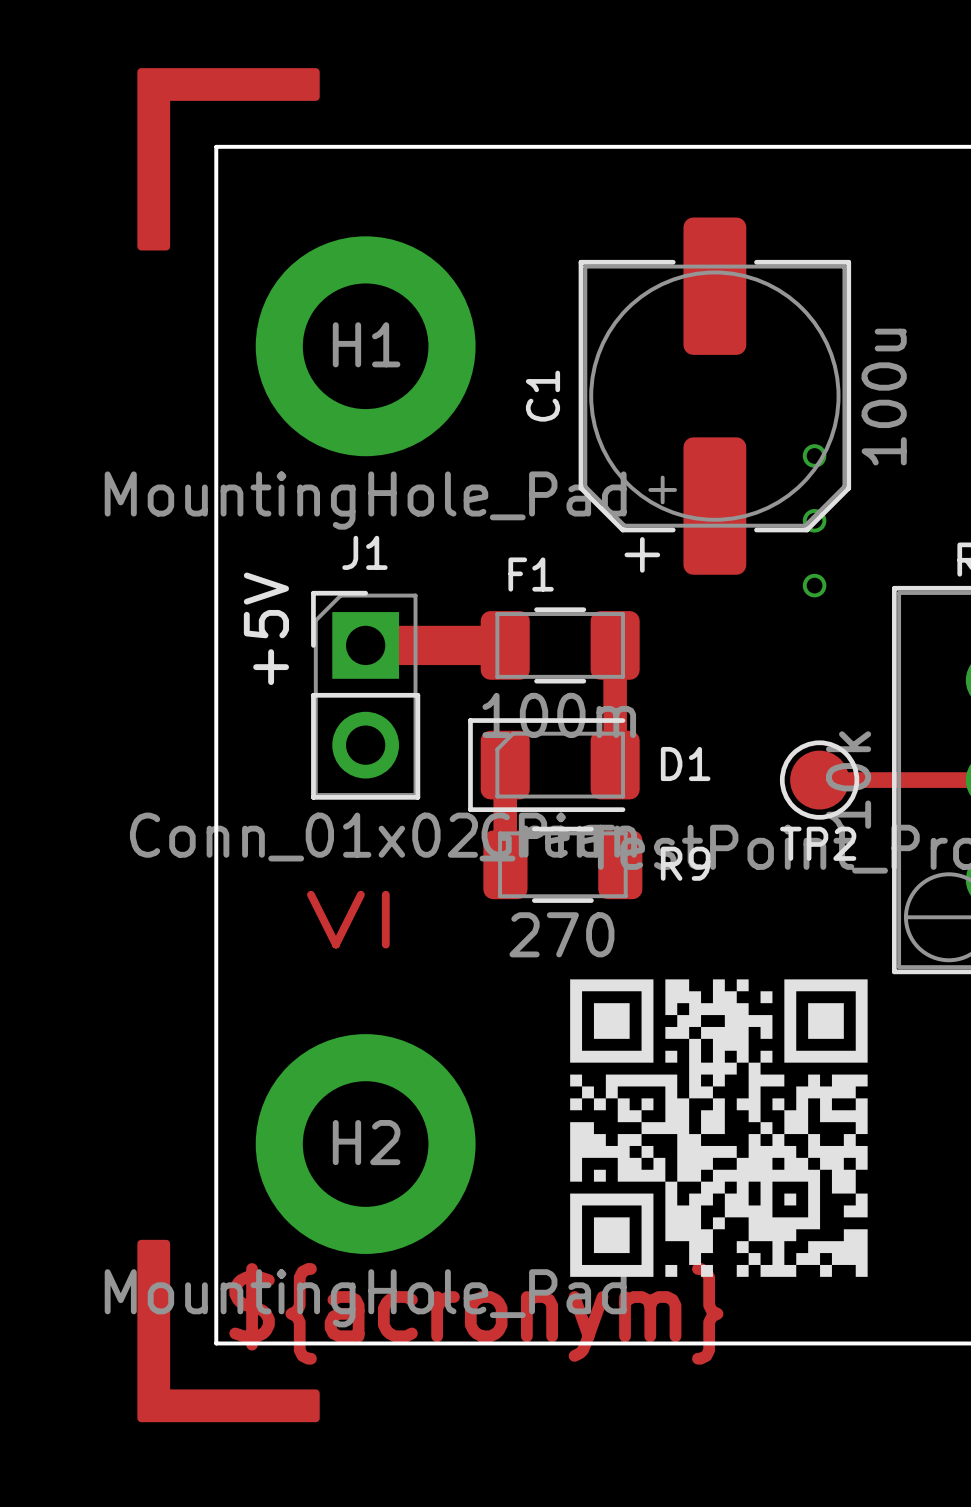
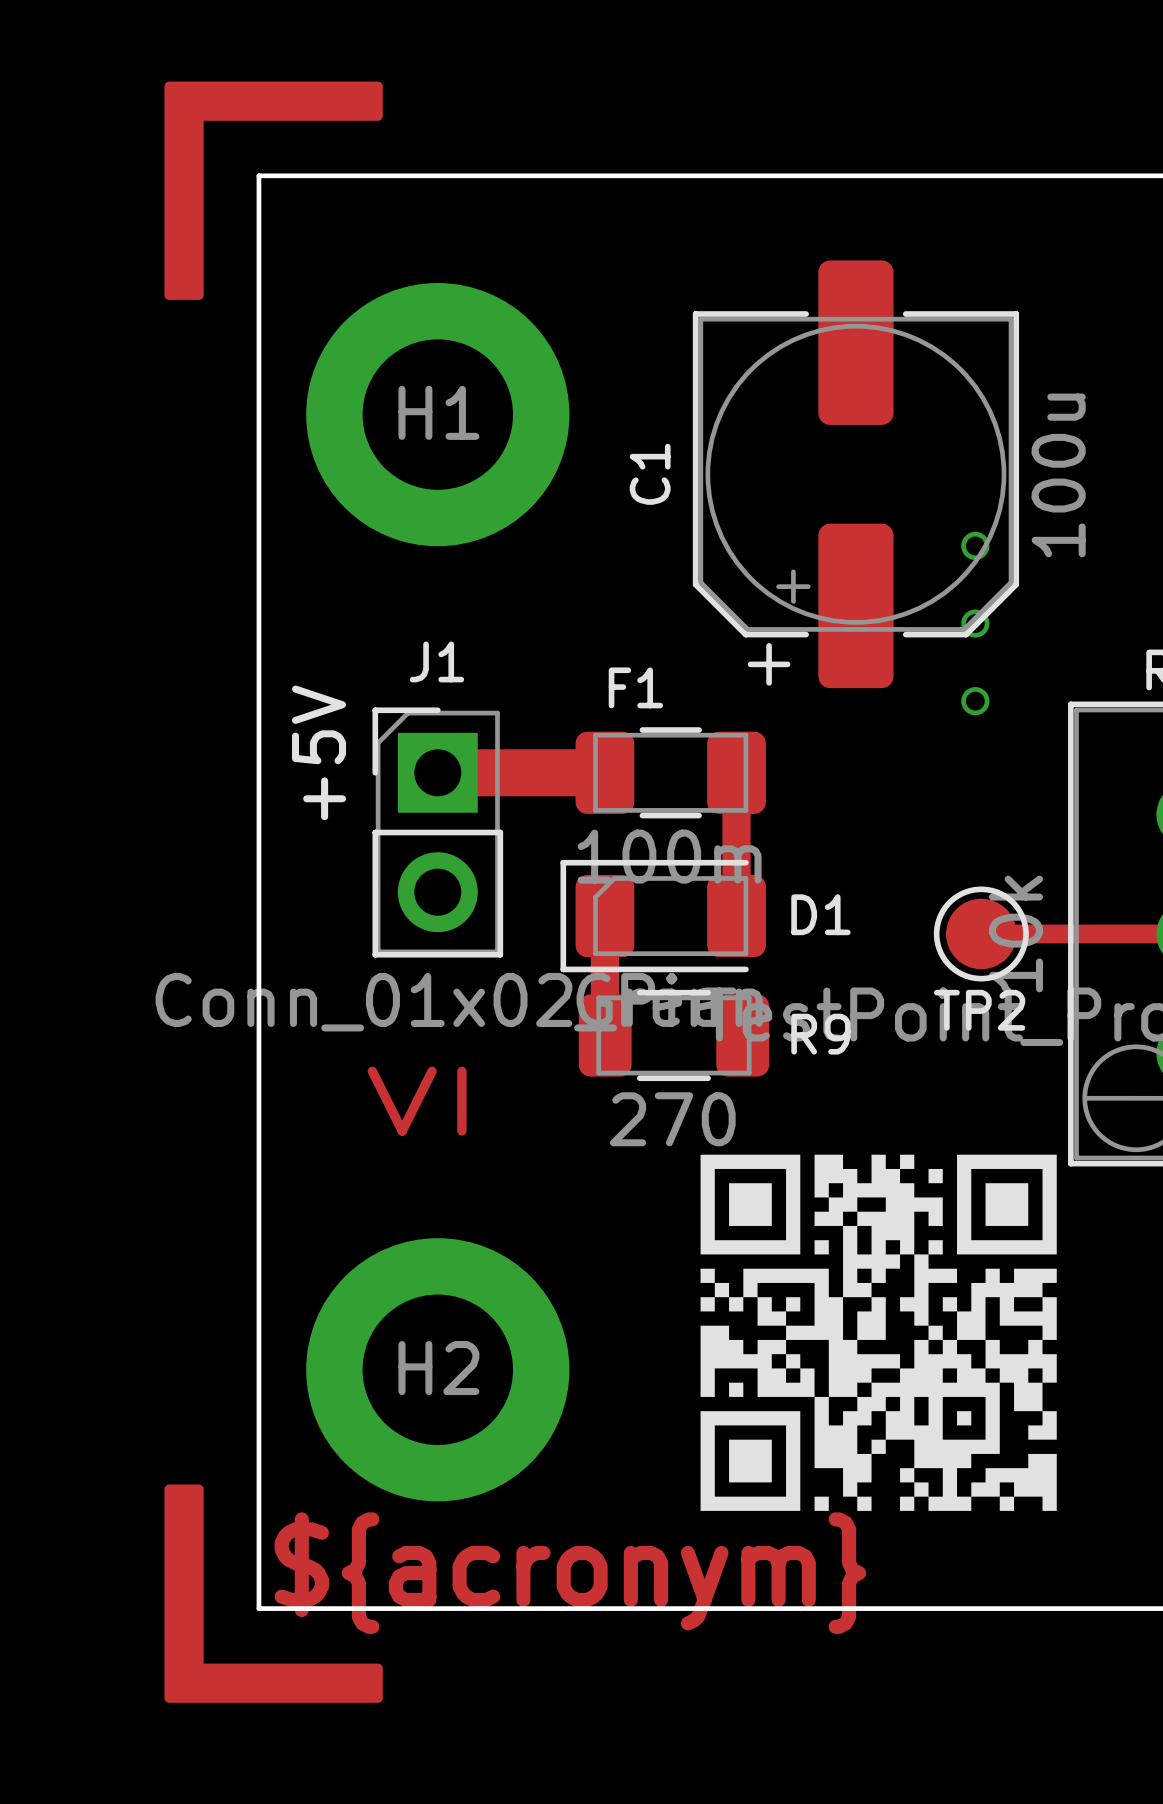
H1 value: MountingHole_Pad (365, 500) -> none
drawing position: (718, 1128) -> (878, 1332)
H2 value: MountingHole_Pad (365, 1298) -> none

